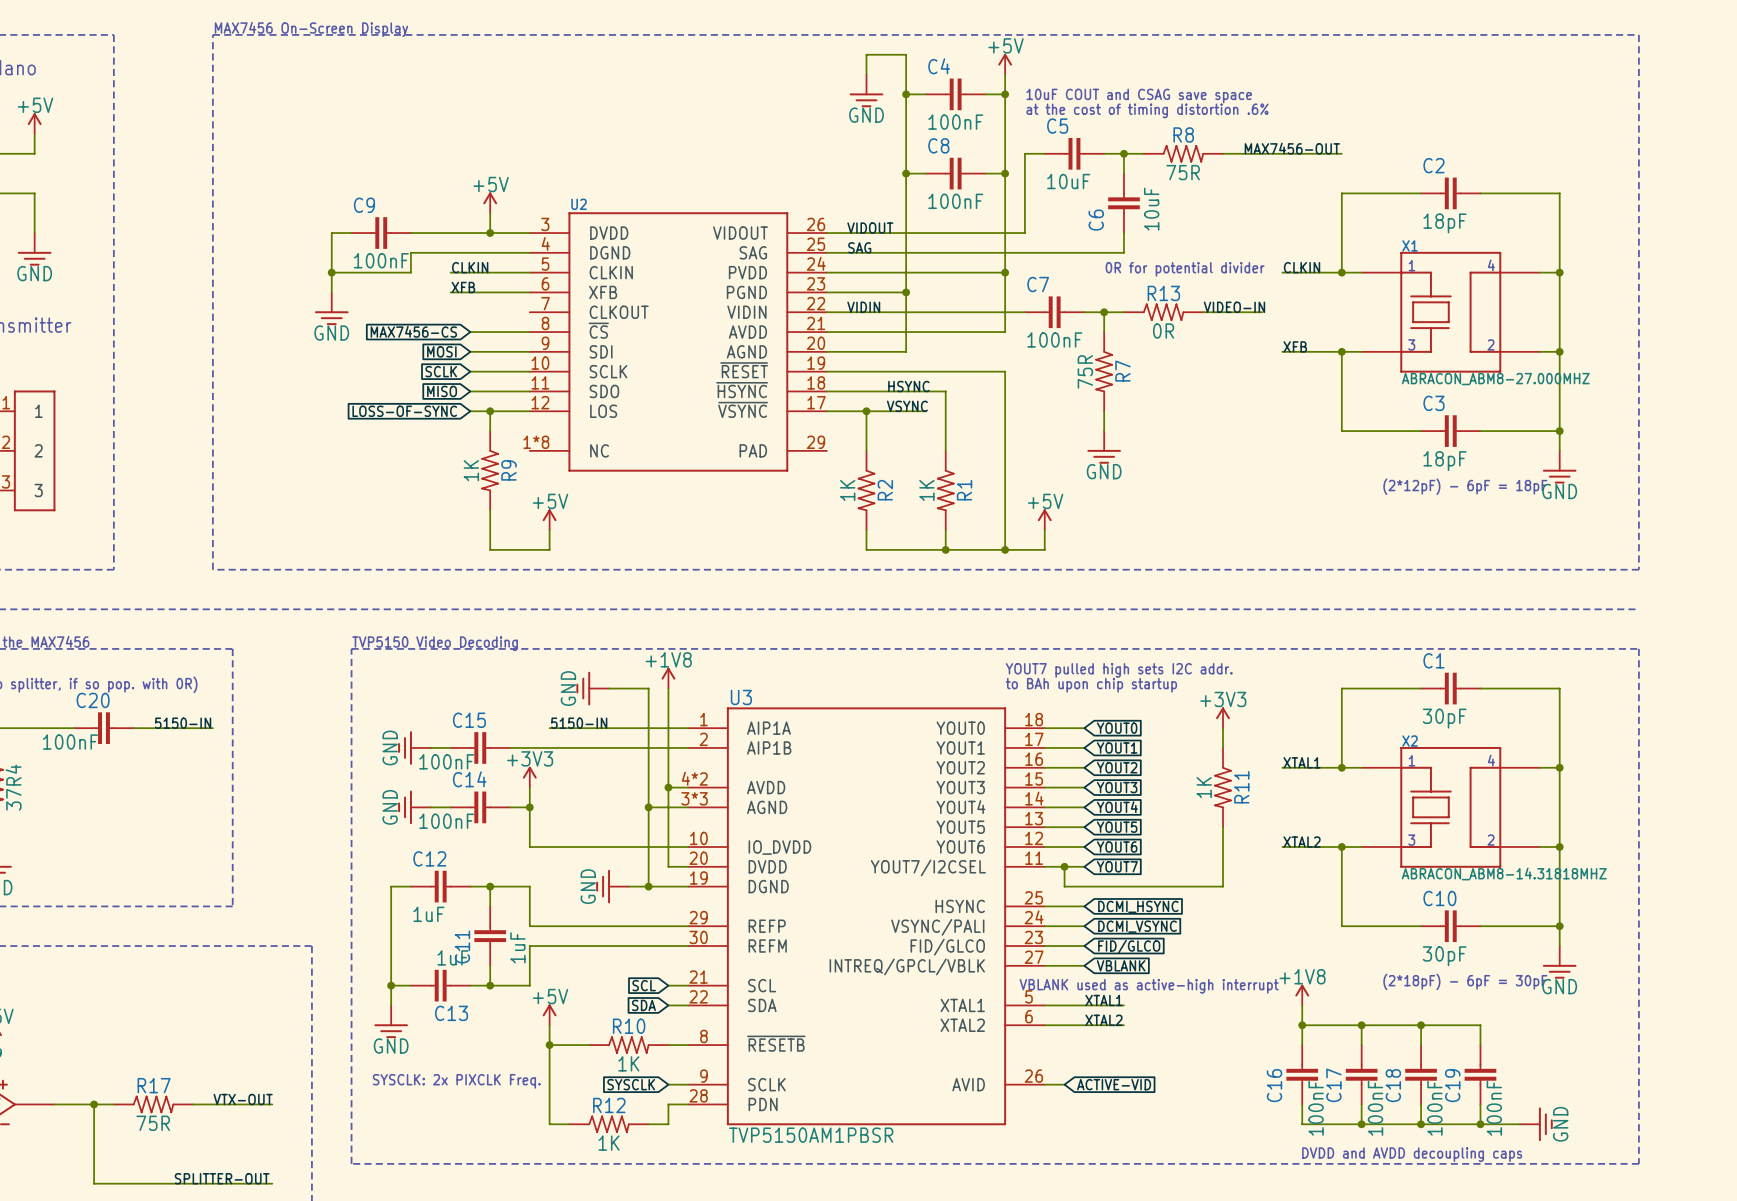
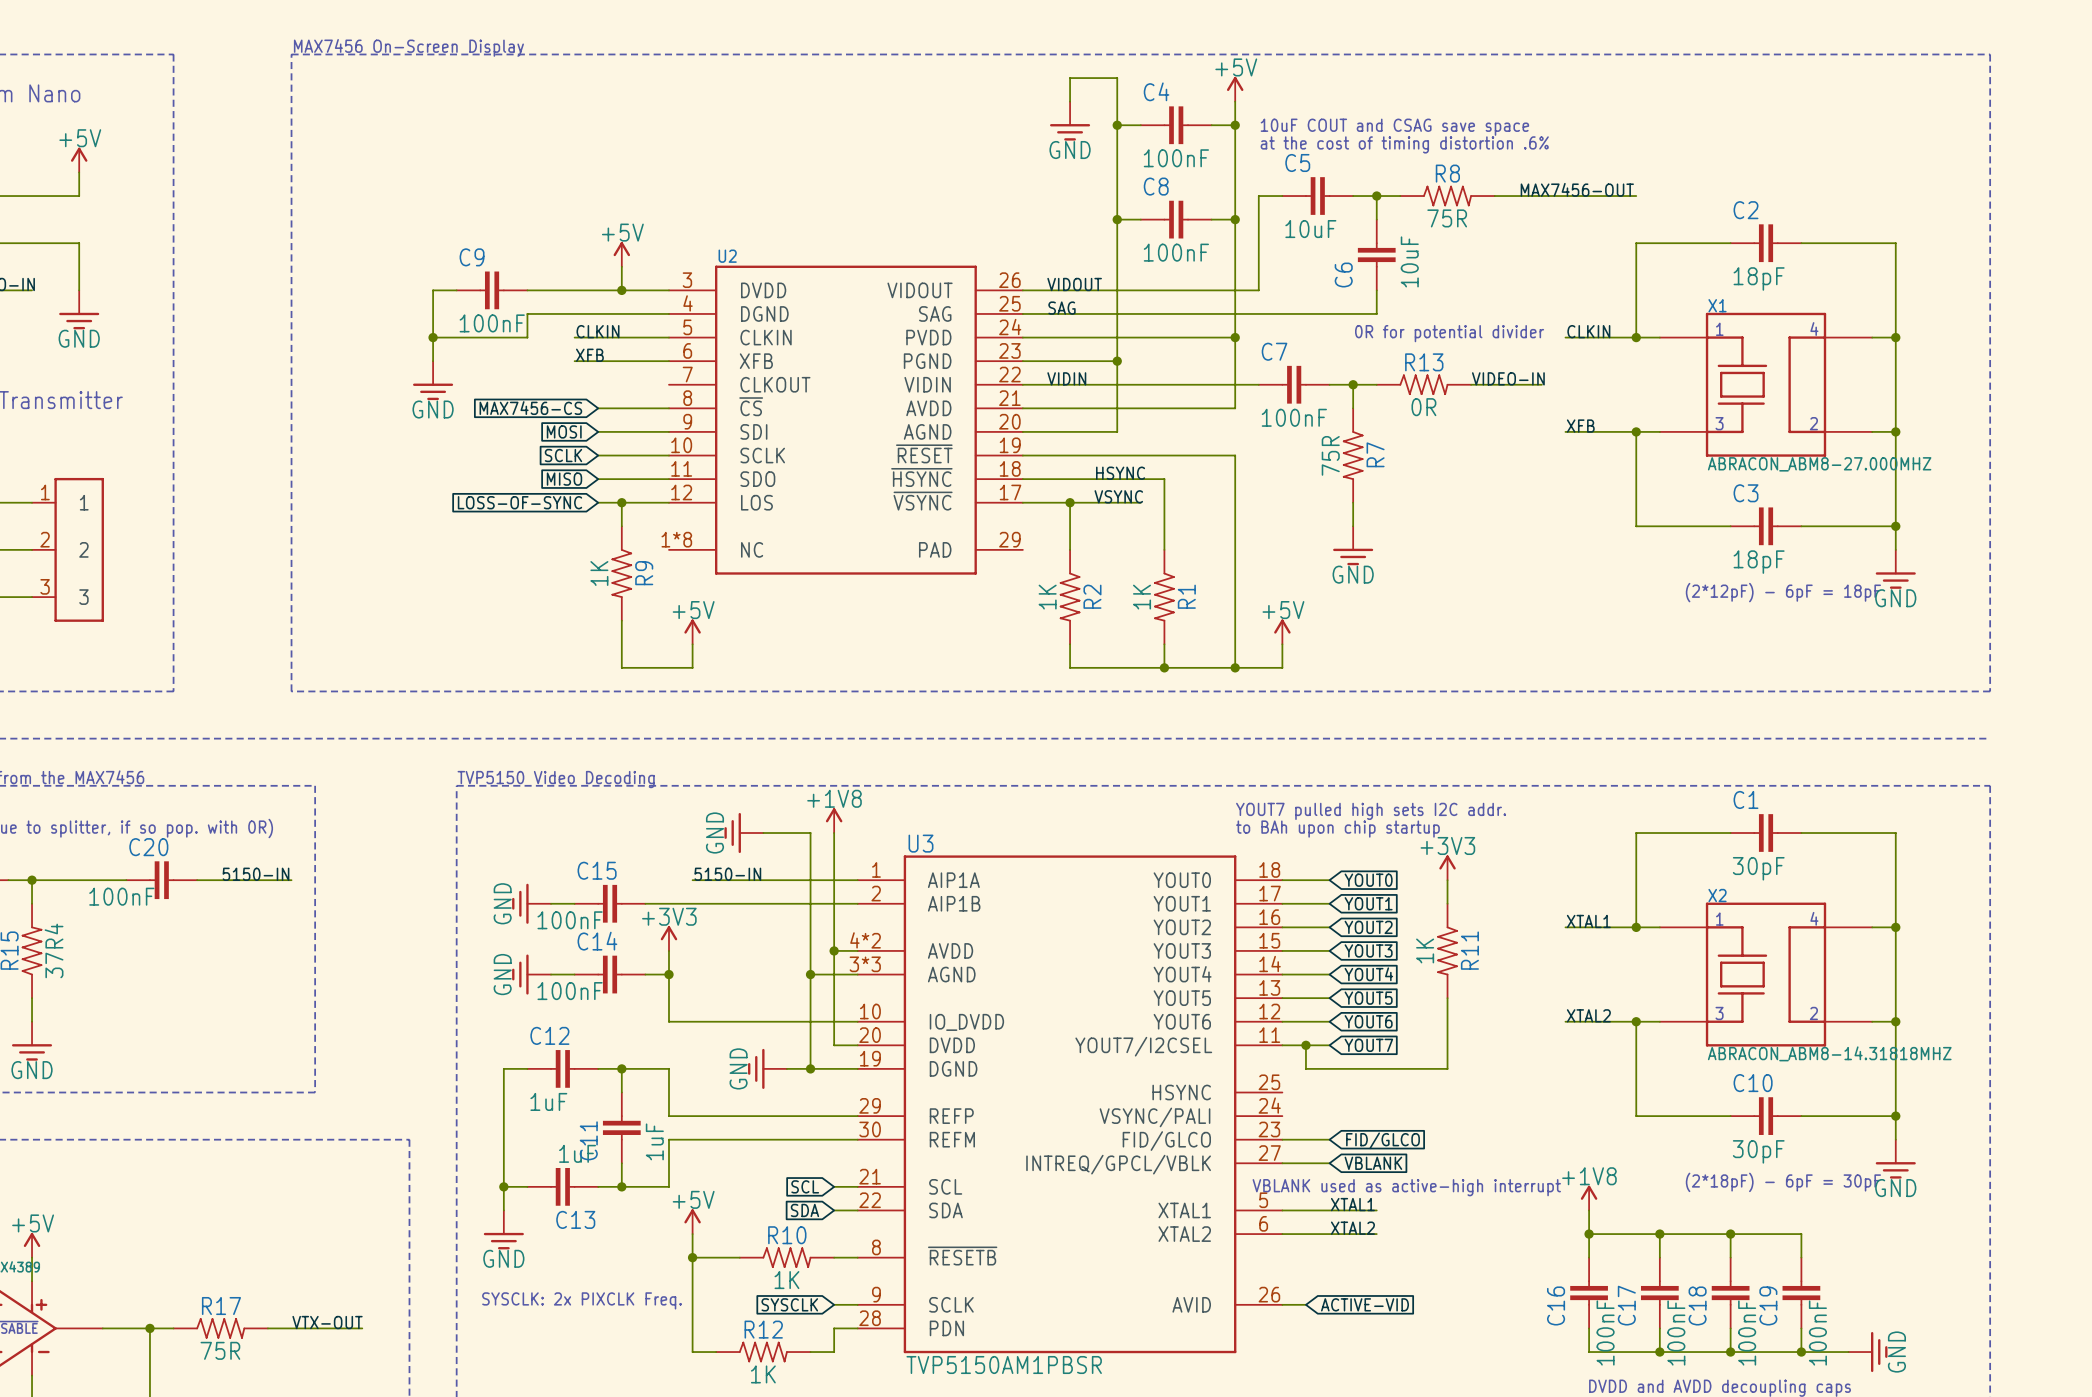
power symbol position: +3V3 (1223, 717) -> +3V3 (1447, 867)
wire: (1223, 728) (1223, 747) -> (1447, 880) (1447, 903)
R11 position: (1223, 787) -> (1447, 950)
wire: (1223, 827) (1223, 886) (1183, 886) -> (1447, 998) (1447, 1068)
wire: (1044, 906) (1084, 906) -> none
global label: DCMI_HSYNC (1138, 906) -> none
wire: (1044, 926) (1084, 926) -> none
global label: DCMI_VSYNC (1137, 926) -> none

